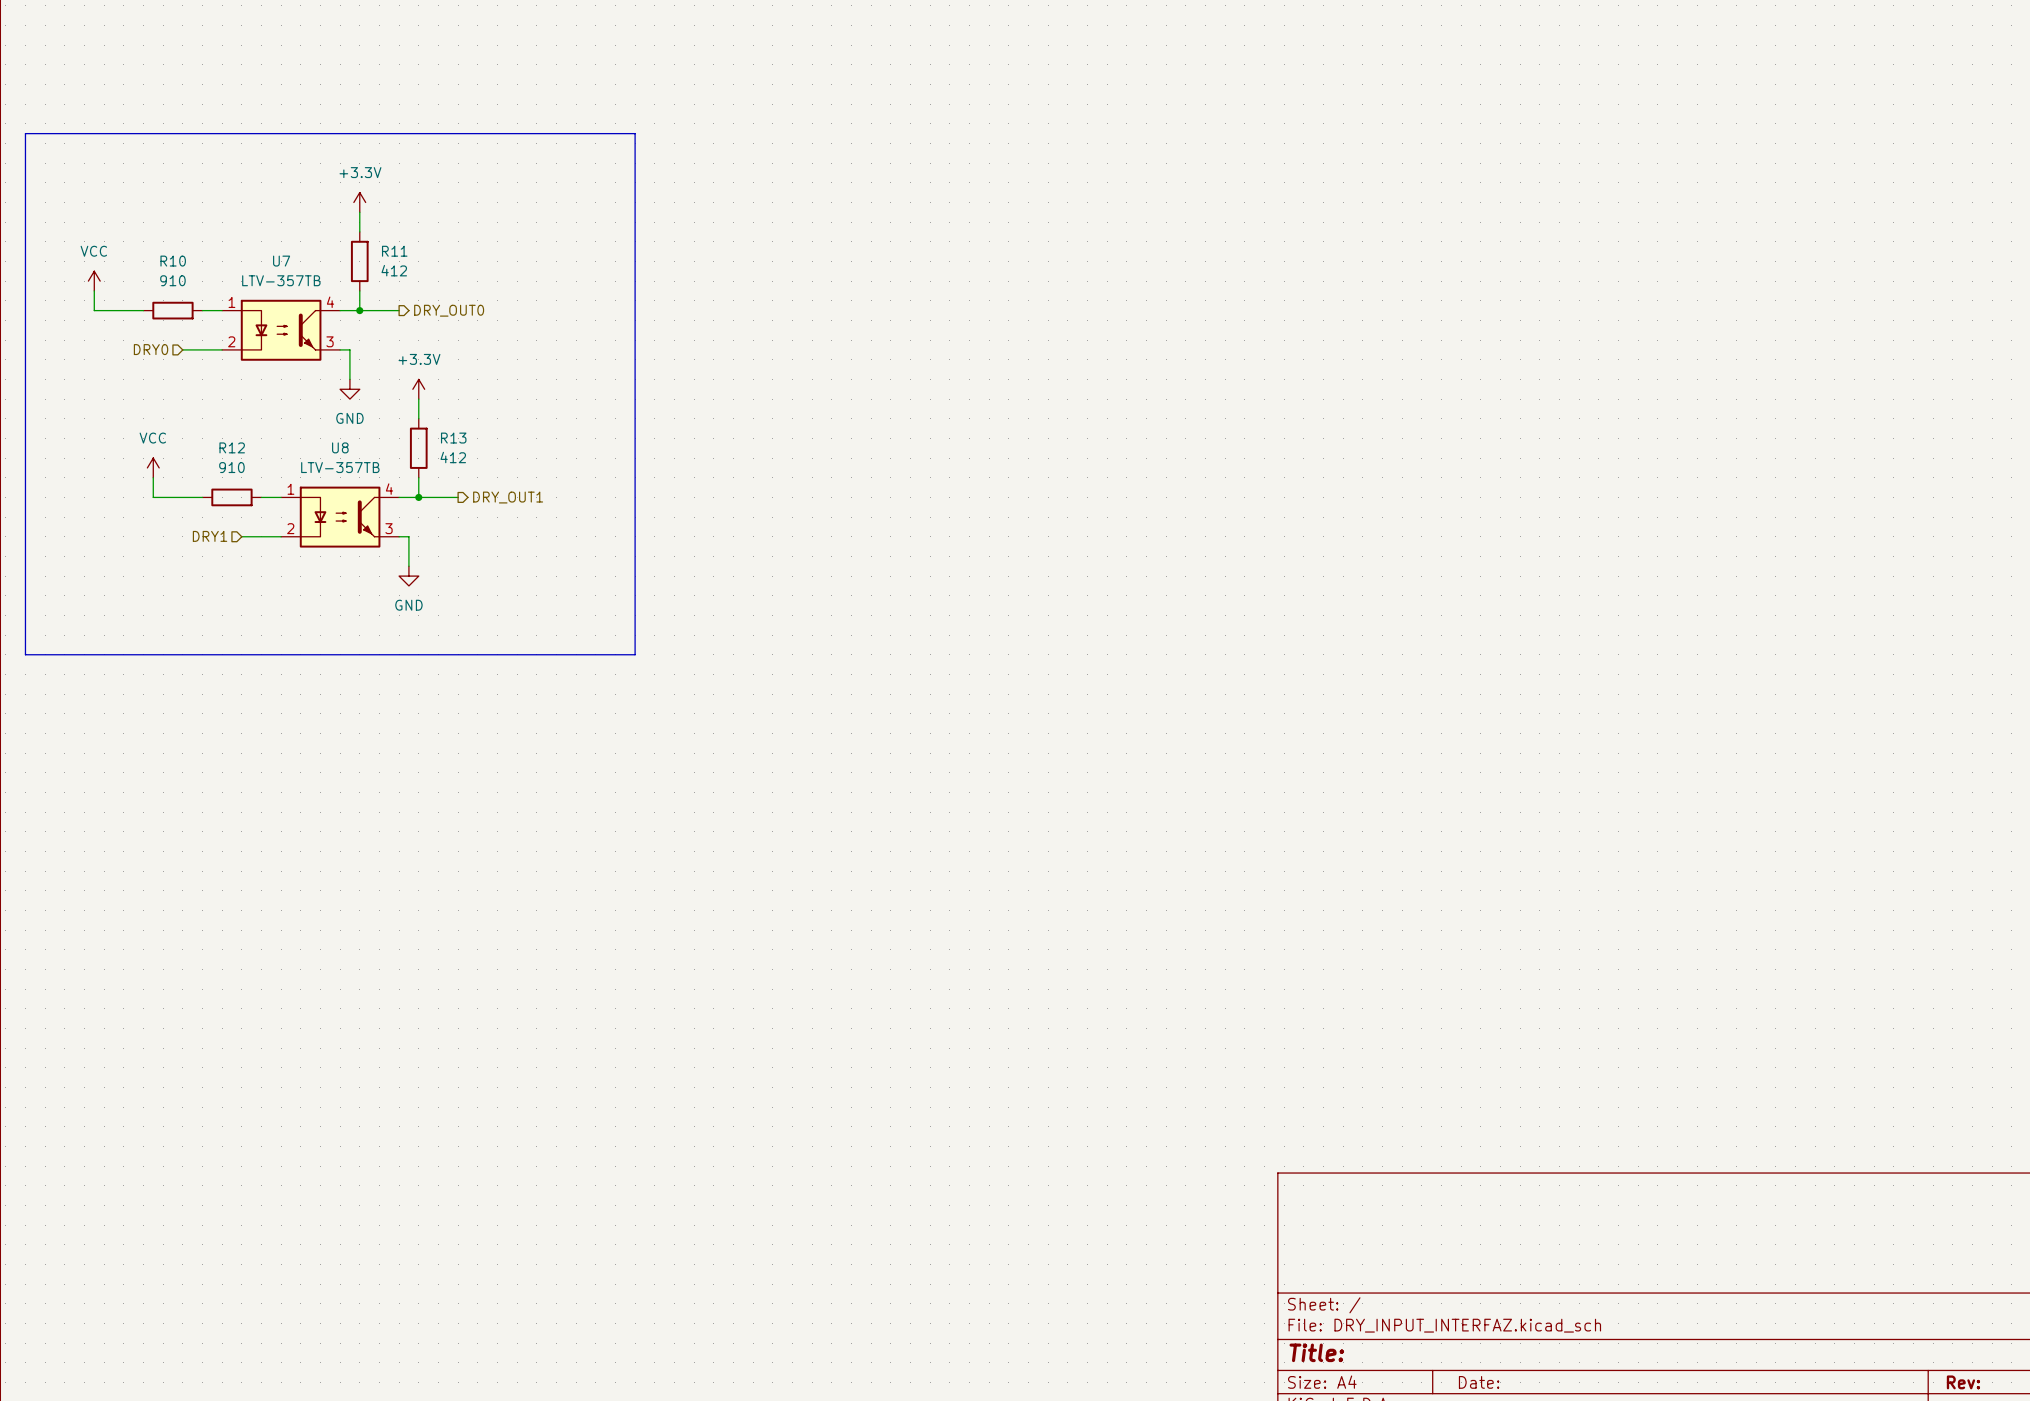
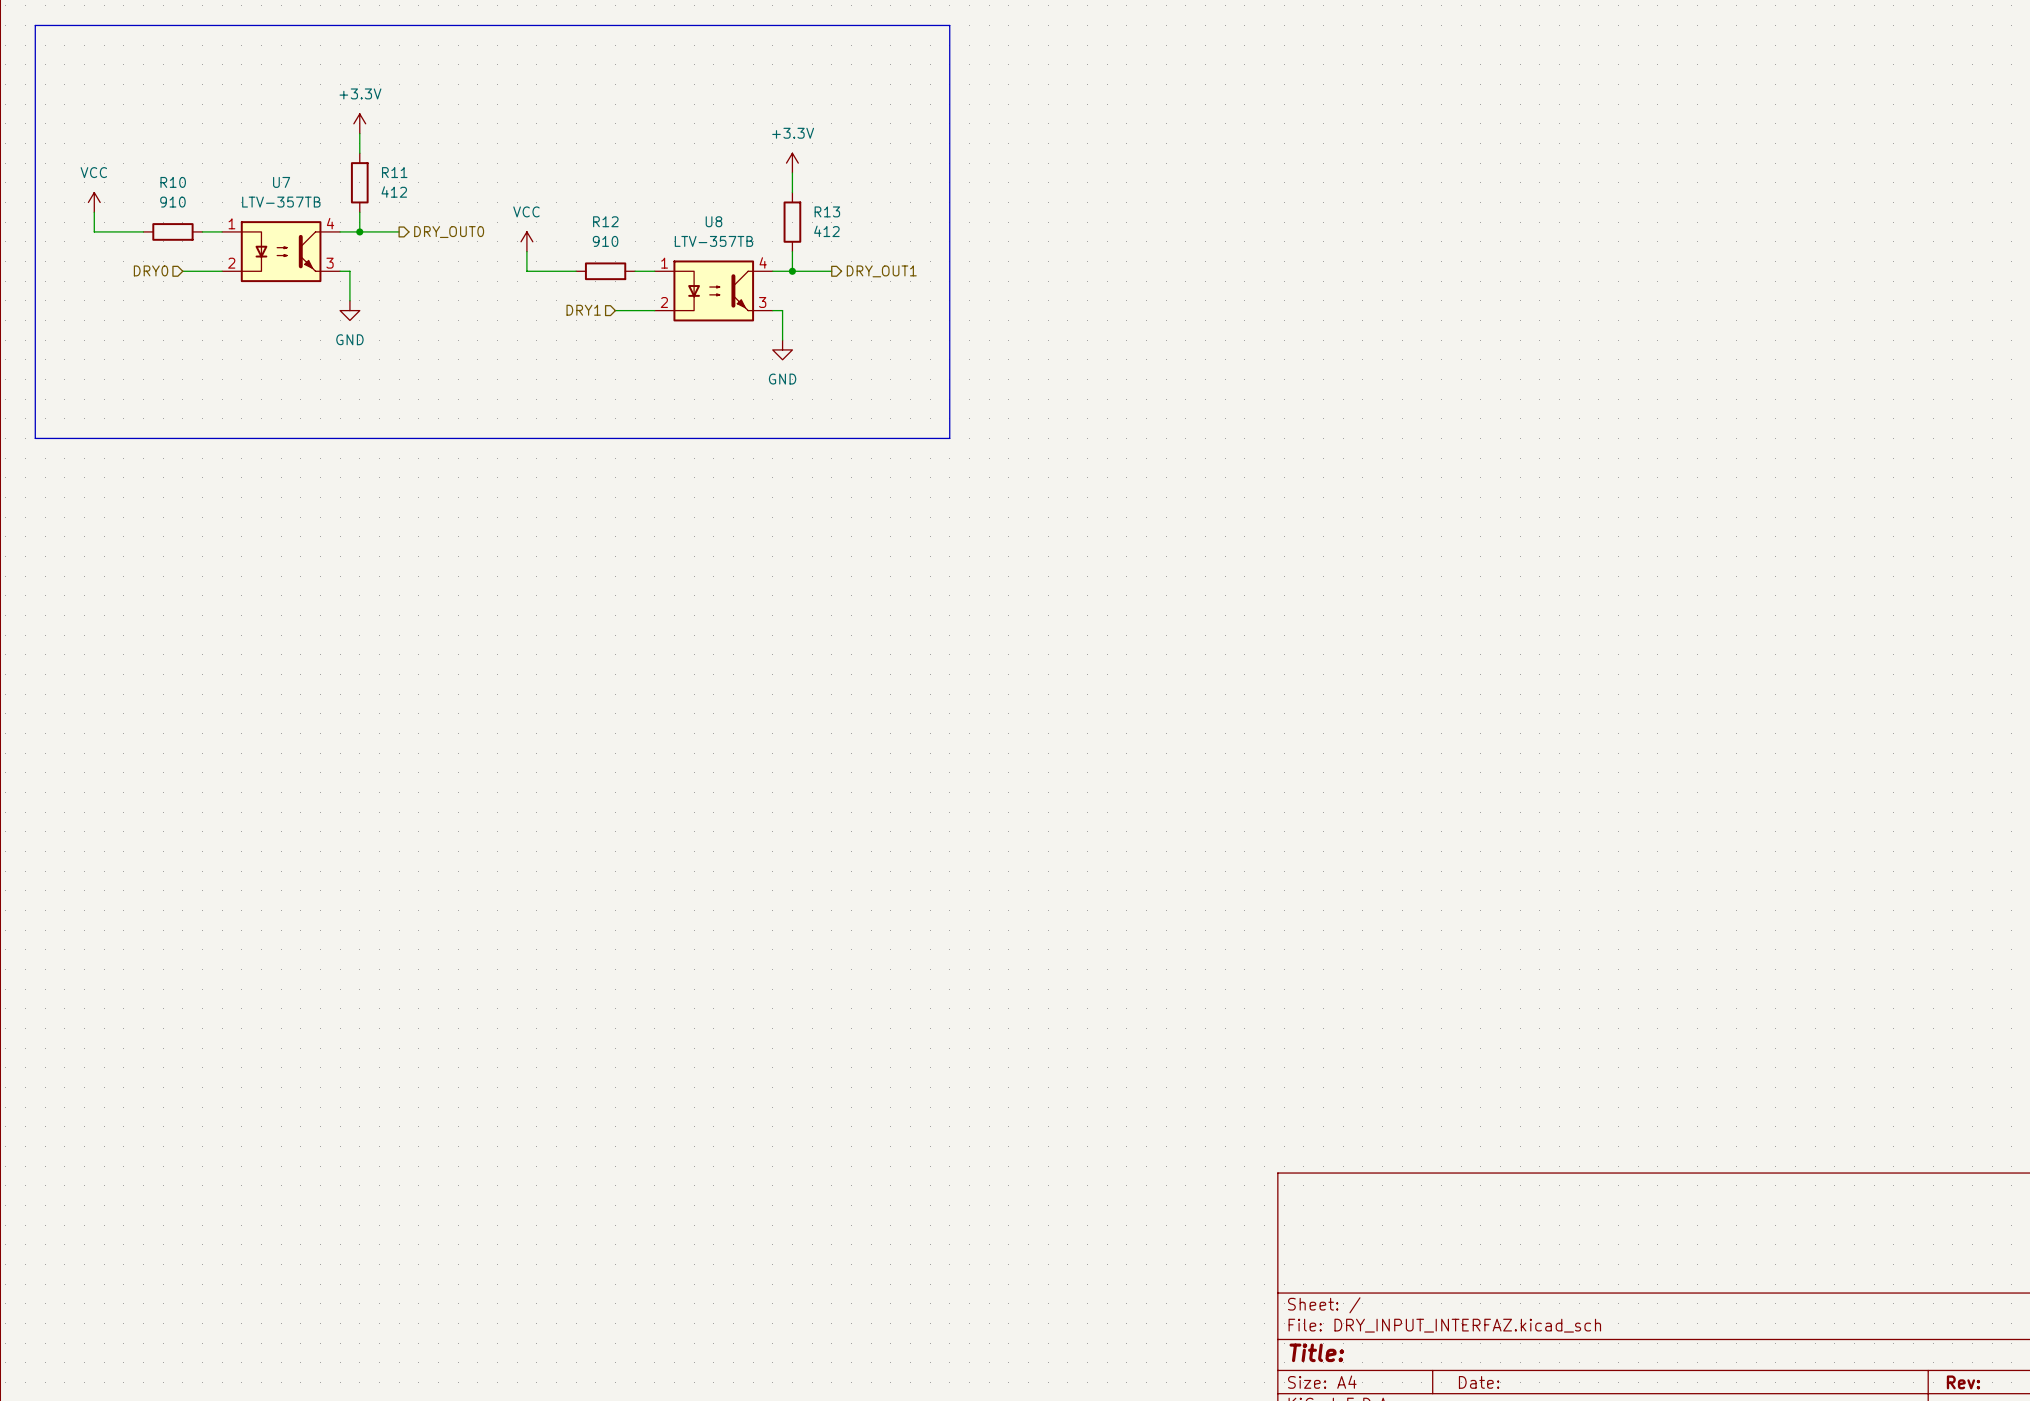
line: none -> (35, 25) (949, 25) (949, 438) (35, 438) (35, 25)
line: (25, 133) (635, 133) (635, 654) (25, 654) (25, 133) -> none
power symbol: none -> +3.3V (792, 163)
wire: none -> (792, 172) (792, 192)
power symbol position: +3.3V (359, 202) -> +3.3V (359, 123)
junction: none -> (359, 231)
power symbol: none -> VCC (526, 241)
wire: none -> (526, 251) (526, 271) (576, 271)
wire: none -> (792, 251) (792, 271)
R11 position: (359, 261) -> (359, 182)
wire: none -> (635, 271) (654, 271)
wire: none -> (772, 271) (831, 271)
junction: none -> (792, 271)
hierarchical label: none -> DRY_OUT1 (881, 271)
power symbol position: VCC (94, 281) -> VCC (94, 202)
wire: (94, 290) (94, 310) (143, 310) -> (94, 212) (94, 231) (143, 231)
wire: (359, 290) (359, 310) -> (359, 133) (359, 153)
R10 position: (172, 310) -> (172, 231)
wire: (202, 310) (222, 310) -> (202, 231) (222, 231)
wire: (340, 310) (399, 310) -> (340, 231) (399, 231)
junction: (359, 310) -> none
hierarchical label position: DRY_OUT0 (449, 310) -> DRY_OUT0 (449, 232)
hierarchical label: none -> DRY1 (583, 310)
wire: none -> (615, 310) (654, 310)
wire: none -> (772, 310) (782, 310) (782, 340)
U7 position: (281, 330) -> (281, 251)
hierarchical label position: DRY0 (151, 349) -> DRY0 (151, 270)
wire: (182, 349) (222, 349) -> (182, 271) (222, 271)
wire: (340, 349) (349, 349) (349, 379) -> (340, 271) (349, 271) (349, 300)
power symbol: none -> GND (782, 349)
power symbol position: GND (349, 389) -> GND (349, 310)
power symbol: +3.3V (418, 389) -> none
wire: (418, 399) (418, 418) -> none
R13 position: (418, 448) -> (792, 222)
power symbol: VCC (153, 467) -> none
wire: (153, 477) (153, 497) (202, 497) -> none
wire: (418, 477) (418, 497) -> none
R12 position: (231, 497) -> (605, 271)
wire: (261, 497) (281, 497) -> none
wire: (399, 497) (458, 497) -> none
junction: (418, 497) -> none
hierarchical label: DRY_OUT1 (508, 497) -> none
U8 position: (340, 517) -> (713, 290)
hierarchical label: DRY1 (210, 536) -> none
wire: (241, 536) (281, 536) -> none
wire: (399, 536) (408, 536) (408, 566) -> none
power symbol: GND (408, 576) -> none

